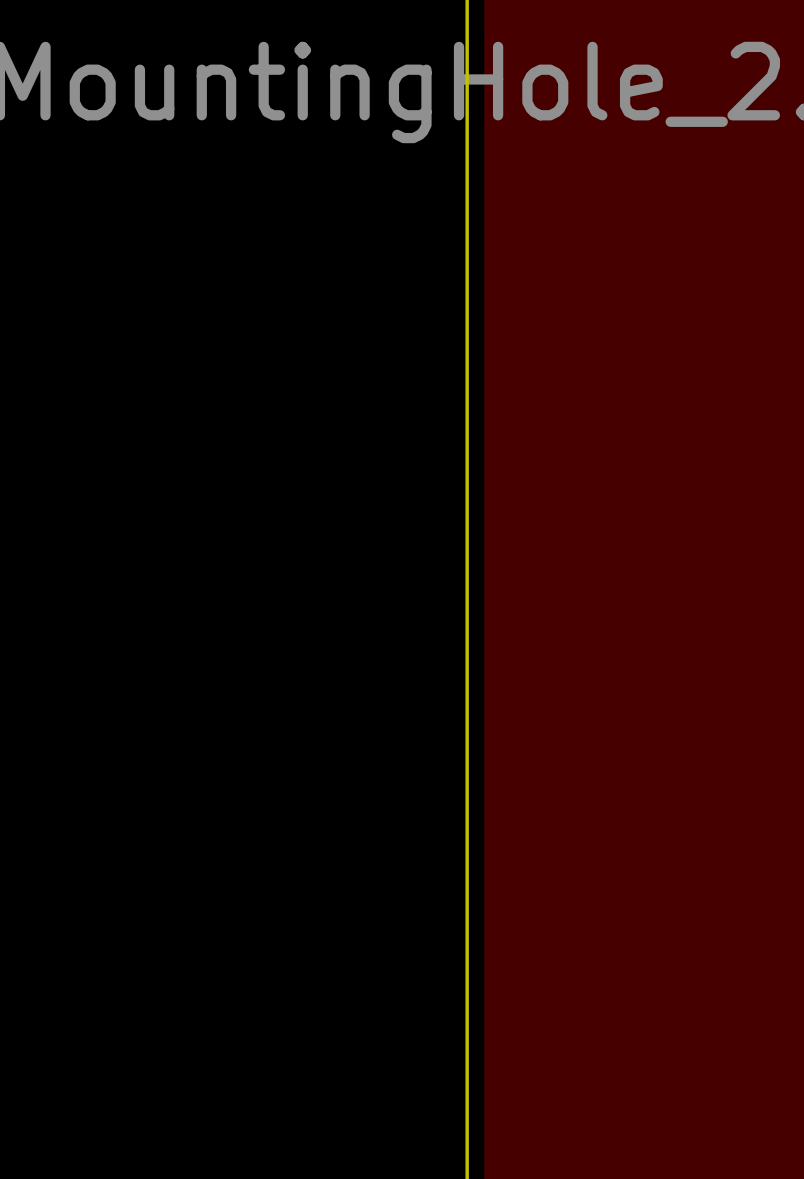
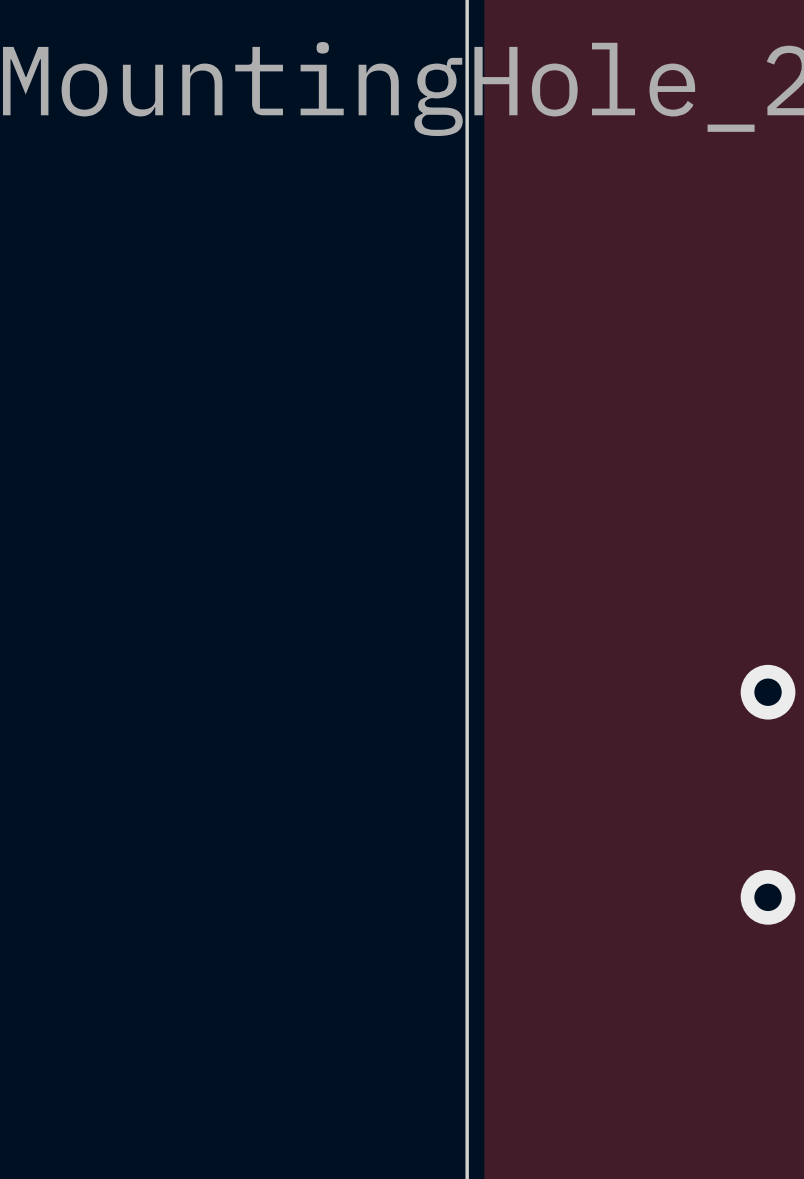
via: none -> (768, 692)
via: none -> (768, 897)

